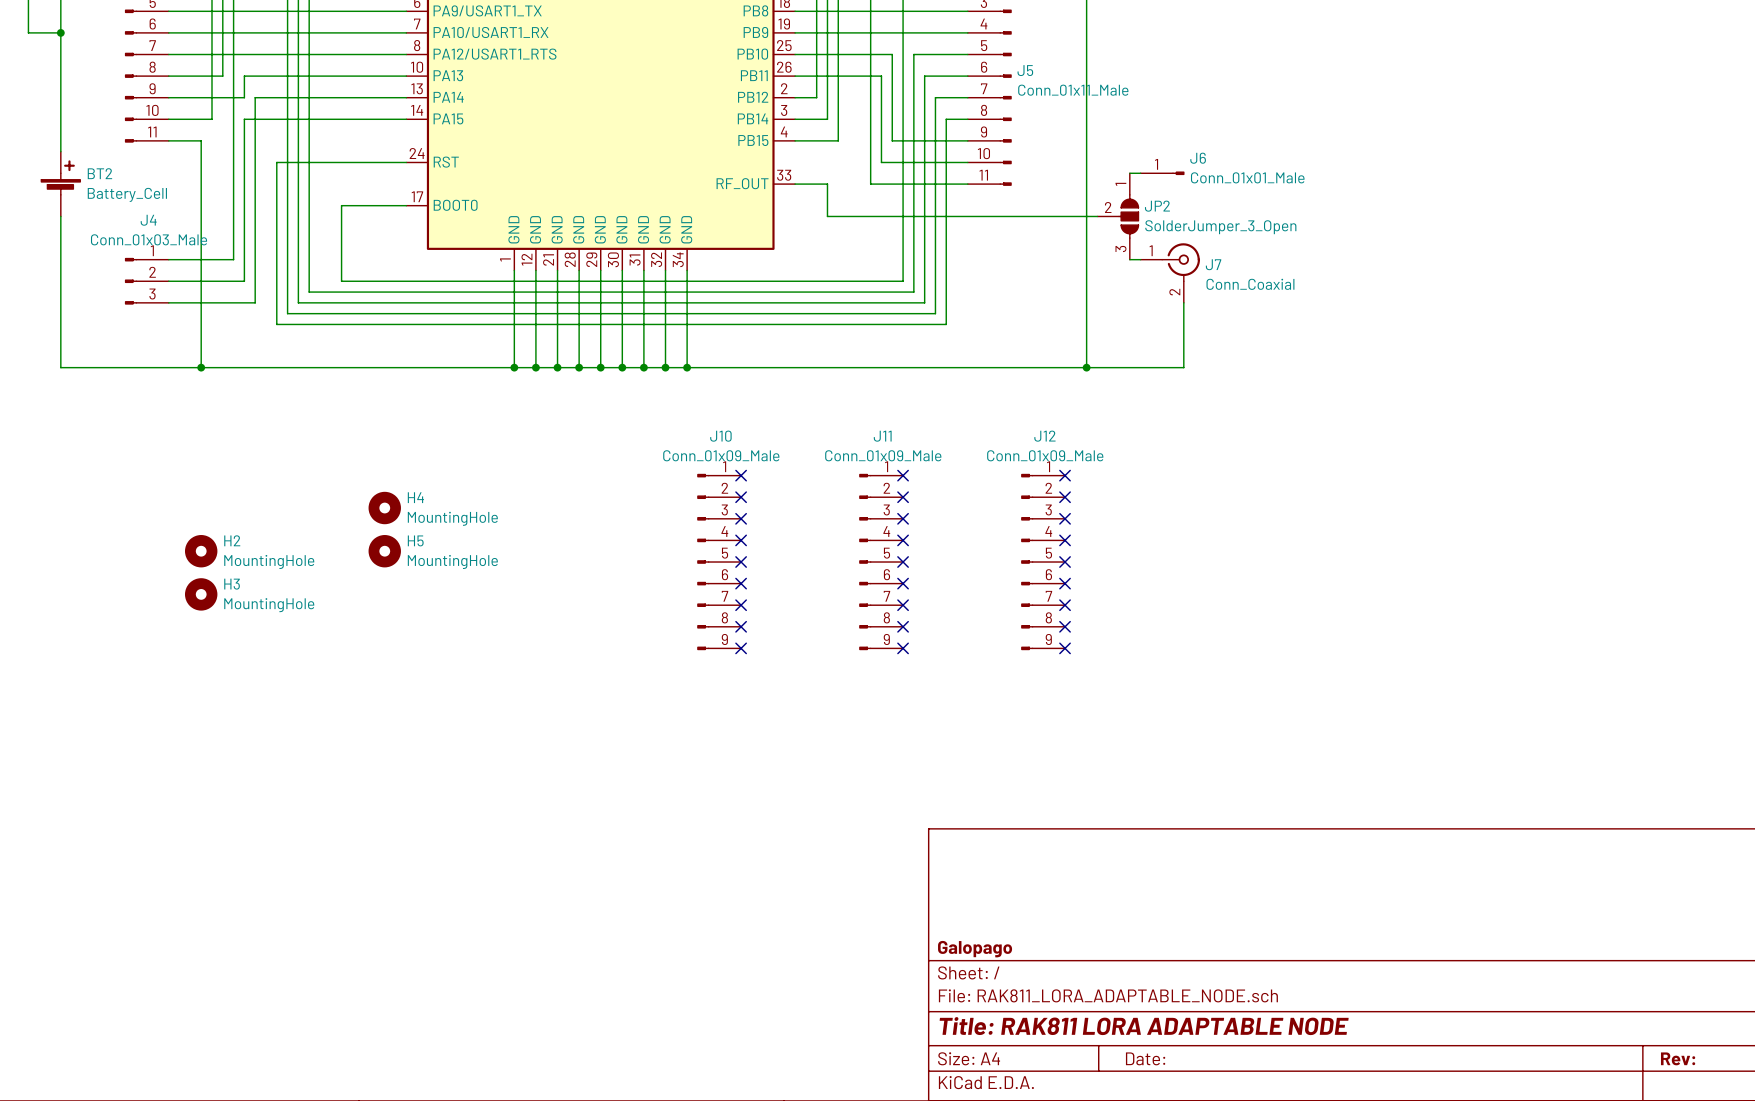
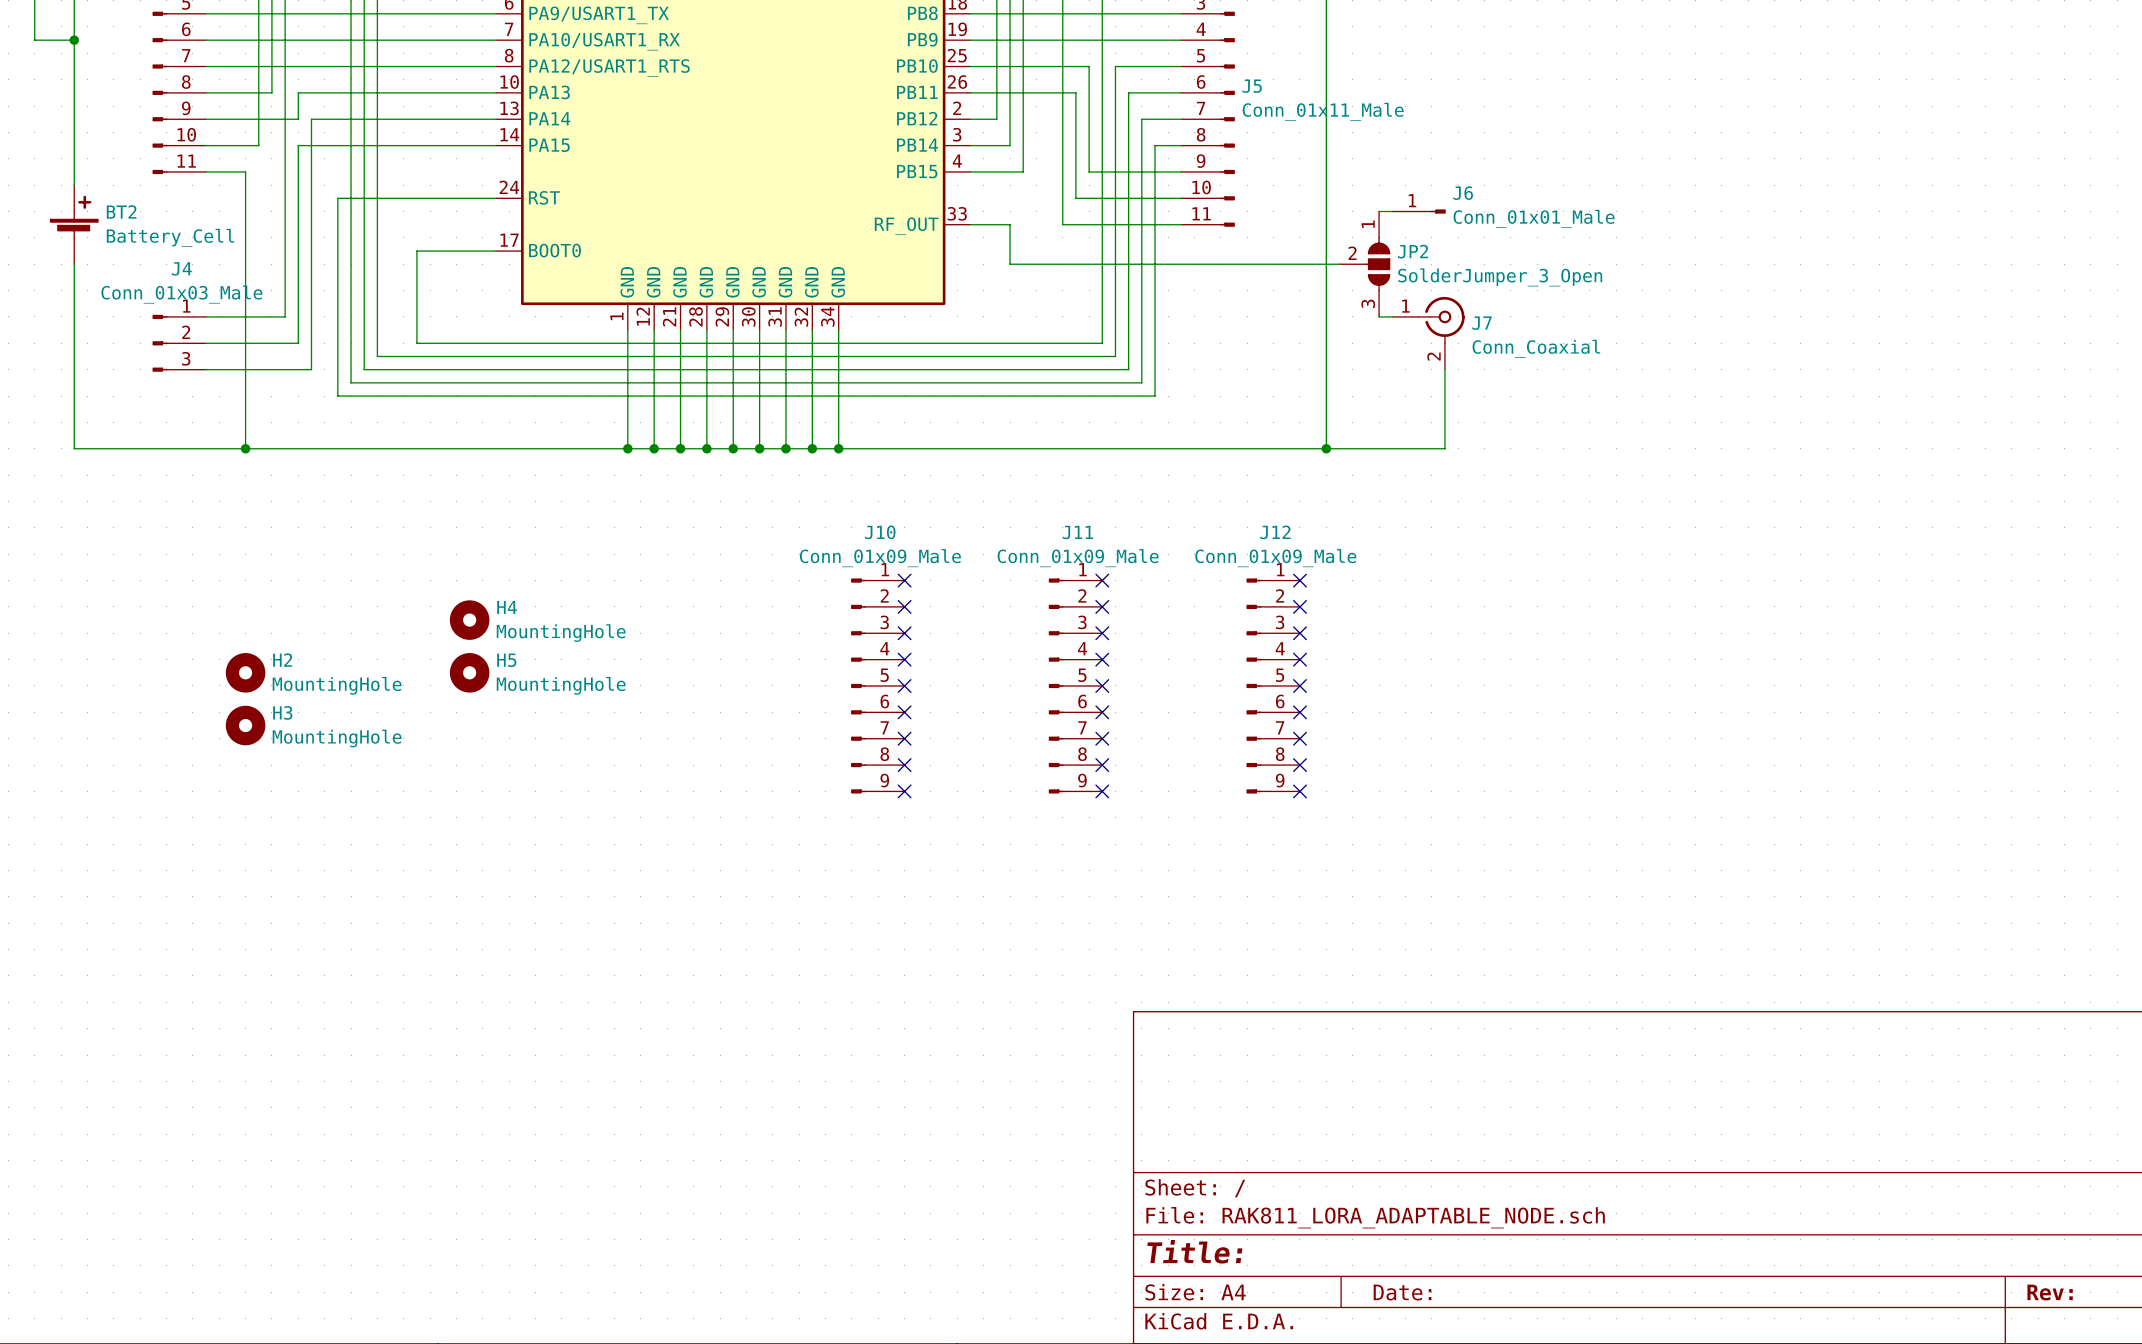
title block: Galopago (975, 949) -> none
title block: Title: RAK811 LORA ADAPTABLE NODE (1144, 1026) -> Title: (1194, 1251)

